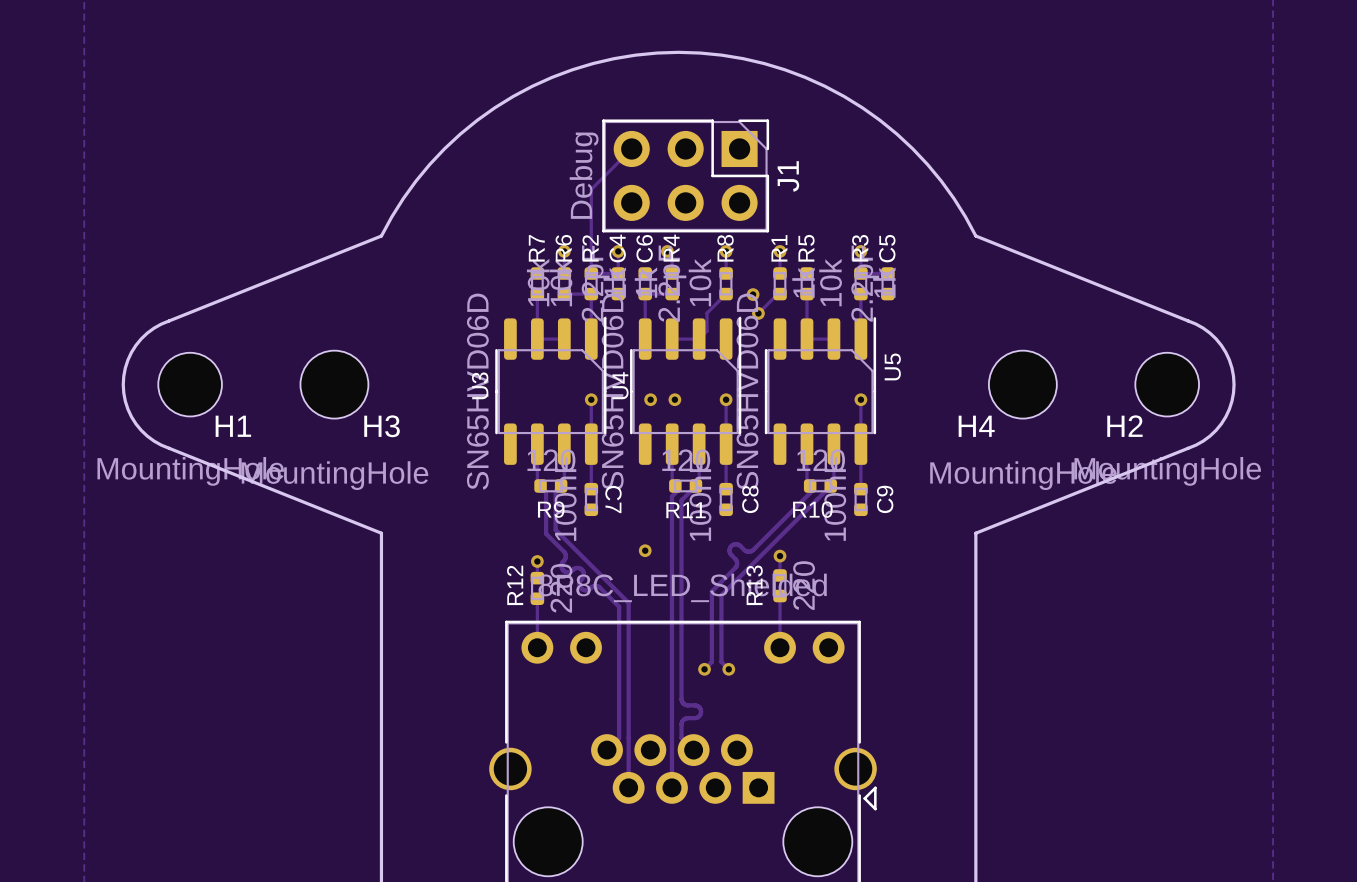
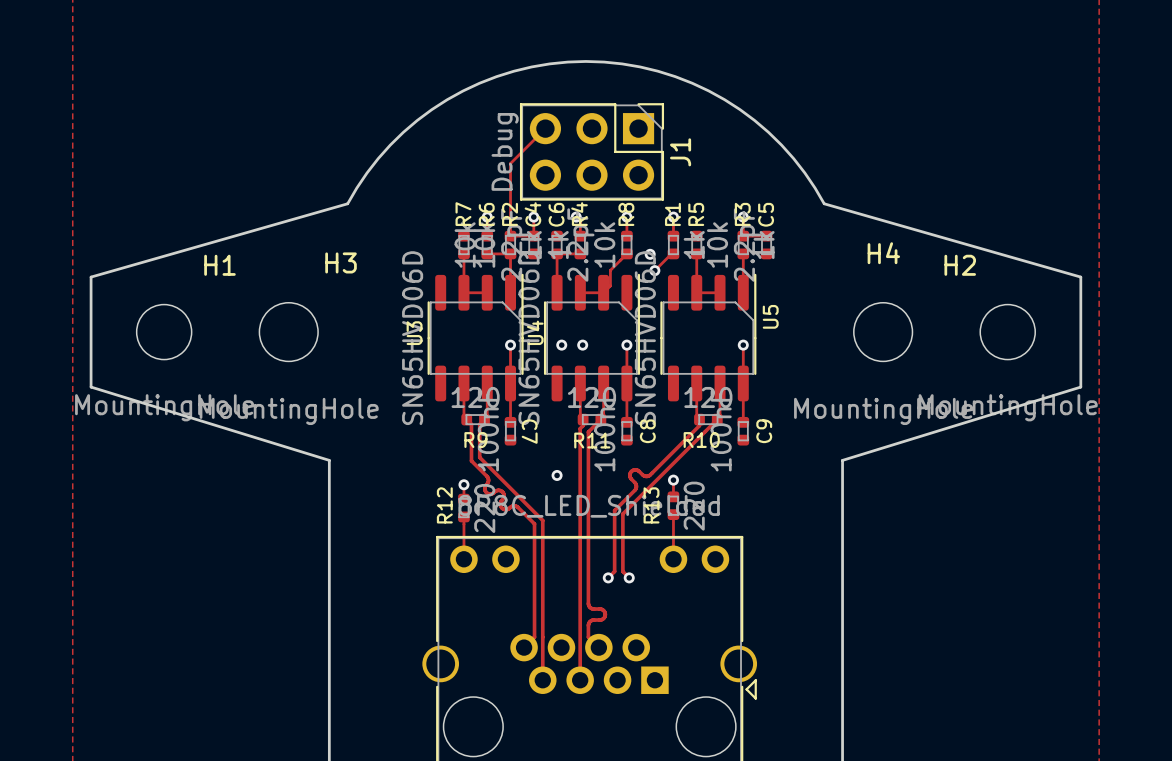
H1 name position: H1 (233, 426) -> H1 (219, 265)
H3 name position: H3 (382, 426) -> H3 (341, 262)
H4 name position: H4 (976, 426) -> H4 (883, 253)
H2 name position: H2 (1124, 426) -> H2 (960, 265)
board edge: (381, 533) (154, 441) (135, 423) (125, 401) (123, 376) (131, 352) (141, 338) (161, 324) (381, 236) (415, 181) (444, 148) (477, 120) (513, 96) (552, 77) (593, 63) (635, 55) (678, 52) (721, 55) (764, 63) (805, 77) (844, 96) (880, 120) (912, 148) (941, 181) (975, 236) (1195, 324) (1216, 338) (1225, 352) (1233, 376) (1231, 401) (1221, 423) (1203, 441) (975, 533) -> (329, 460) (91, 387) (91, 277) (347, 203) (367, 172) (390, 145) (417, 120) (447, 99) (479, 83) (513, 71) (549, 63) (585, 61) (622, 63) (657, 71) (692, 83) (724, 99) (754, 120) (781, 145) (804, 172) (824, 203) (1080, 277) (1080, 387) (842, 460)

